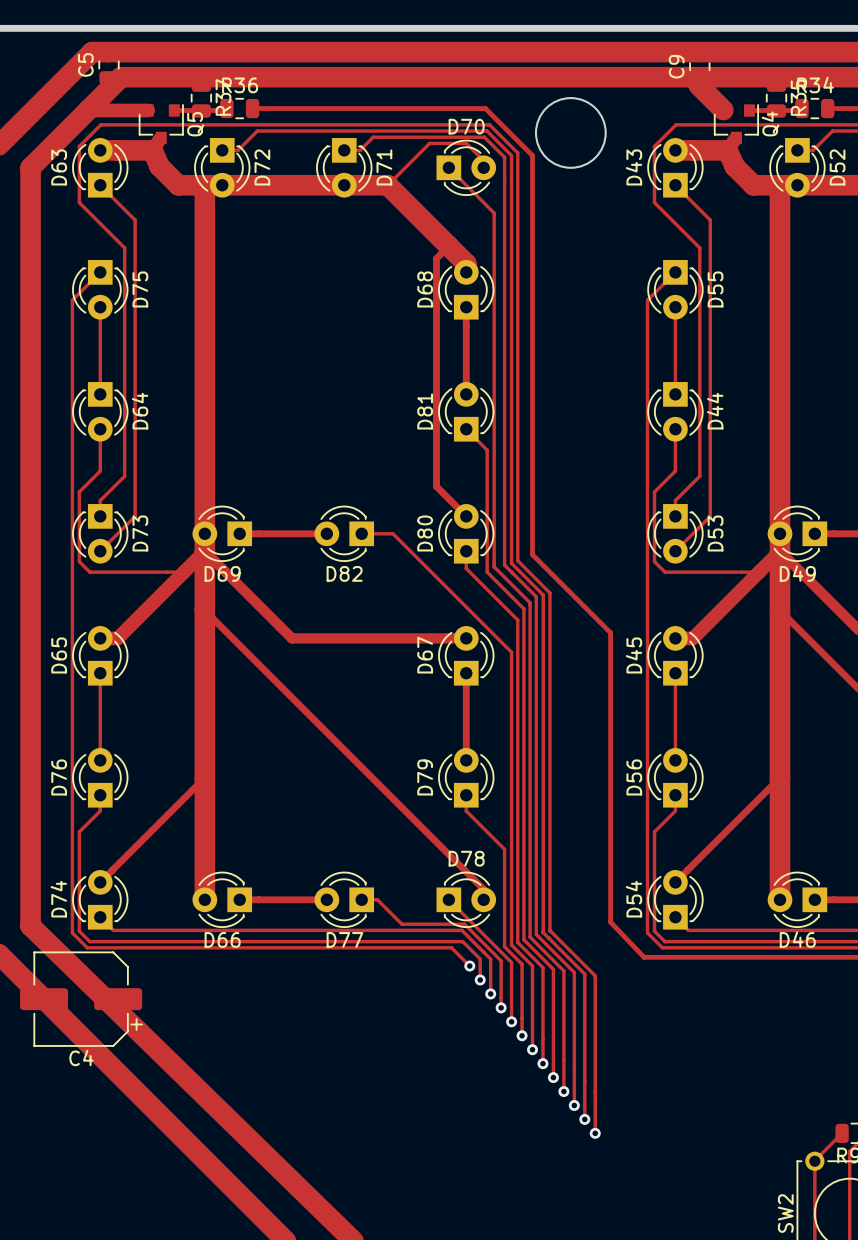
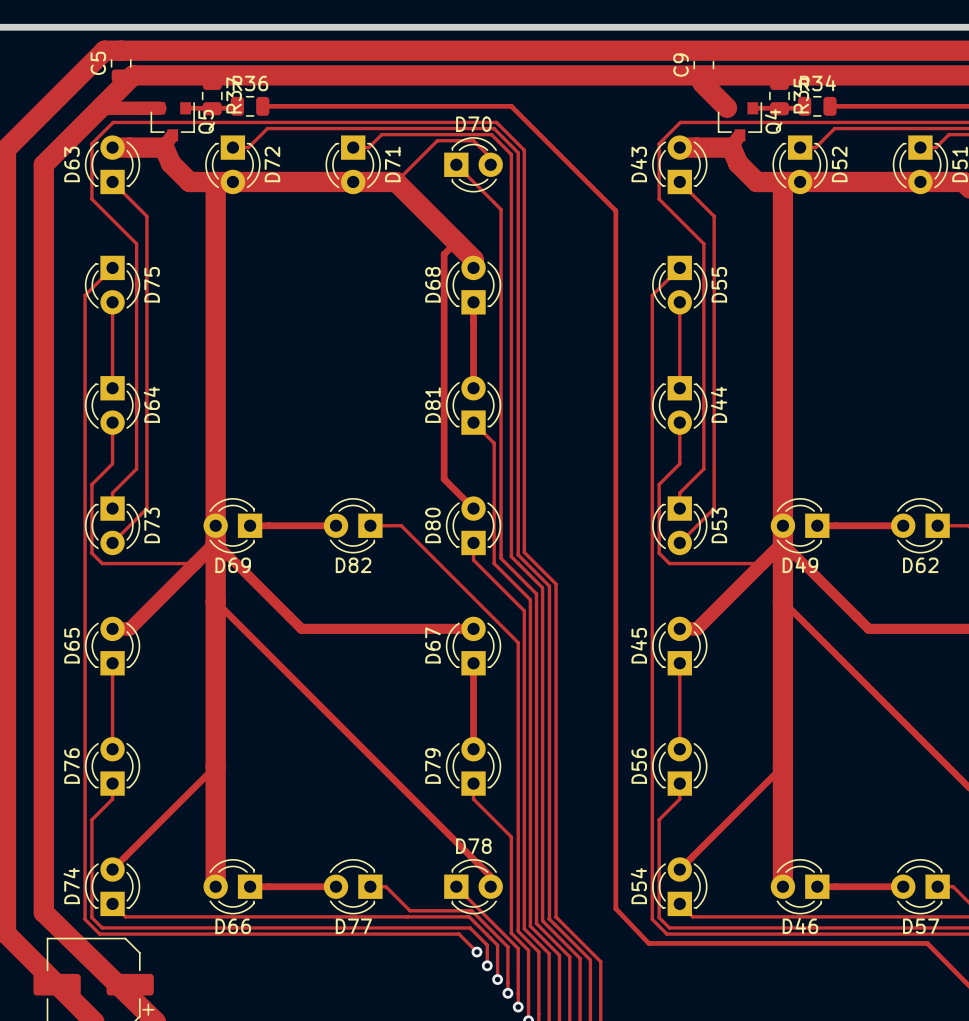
round board edge: [534, 97, 607, 169] -> none
track: (485, 108) (532, 155) (532, 554) (610, 632) -> (492, 106) (511, 106) (615, 210) (615, 623)

